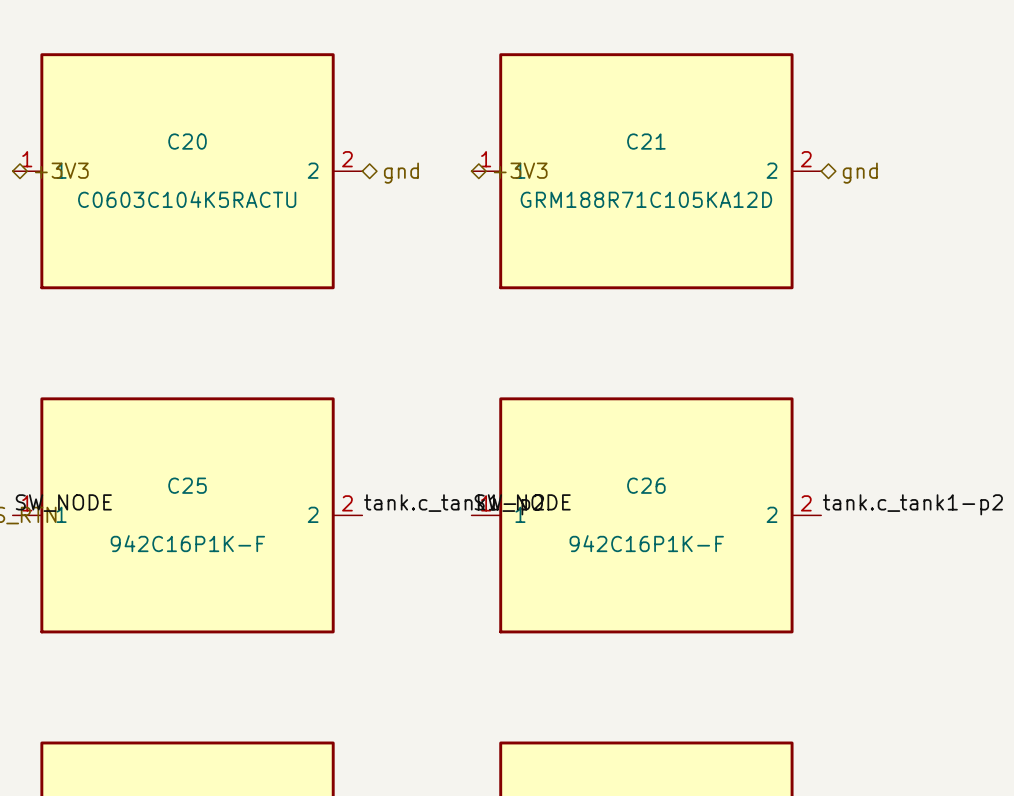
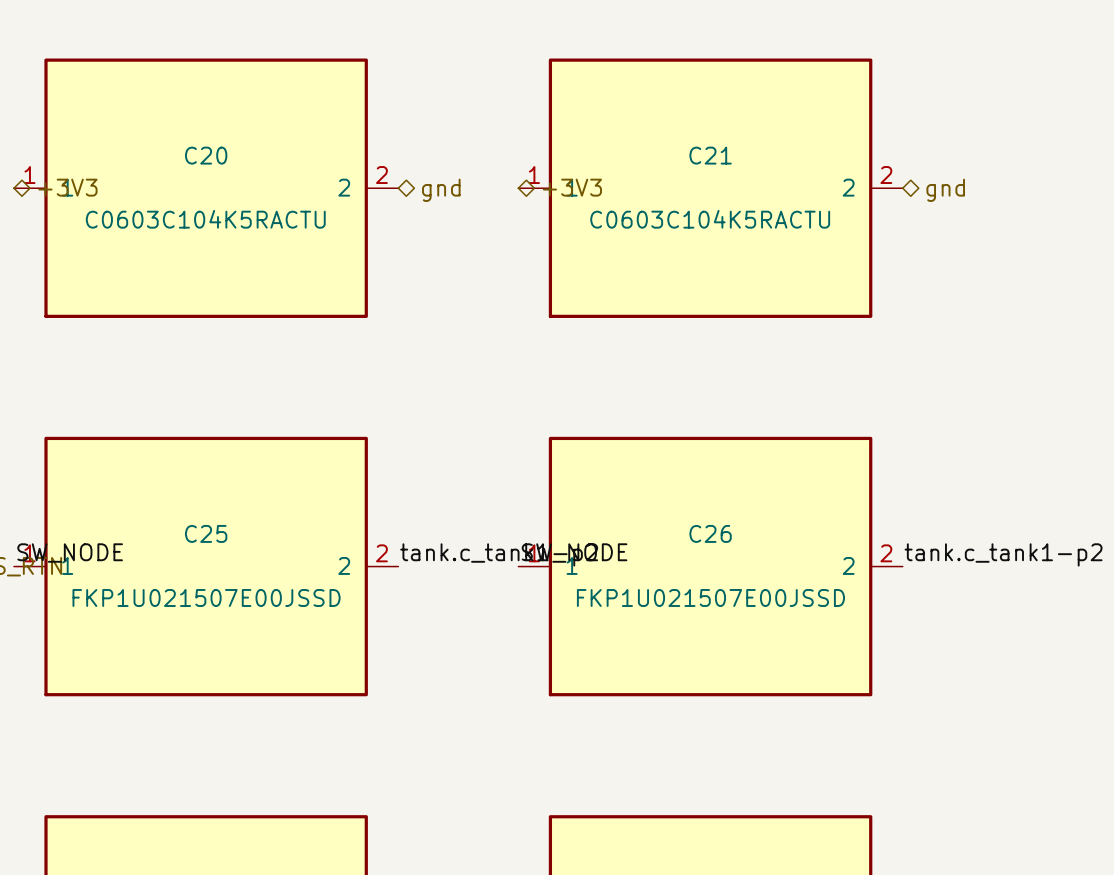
C21 value: GRM188R71C105KA12D (646, 199) -> C0603C104K5RACTU (710, 219)
C25 value: 942C16P1K-F (187, 543) -> FKP1U021507E00JSSD (206, 597)
C26 value: 942C16P1K-F (646, 543) -> FKP1U021507E00JSSD (710, 597)

